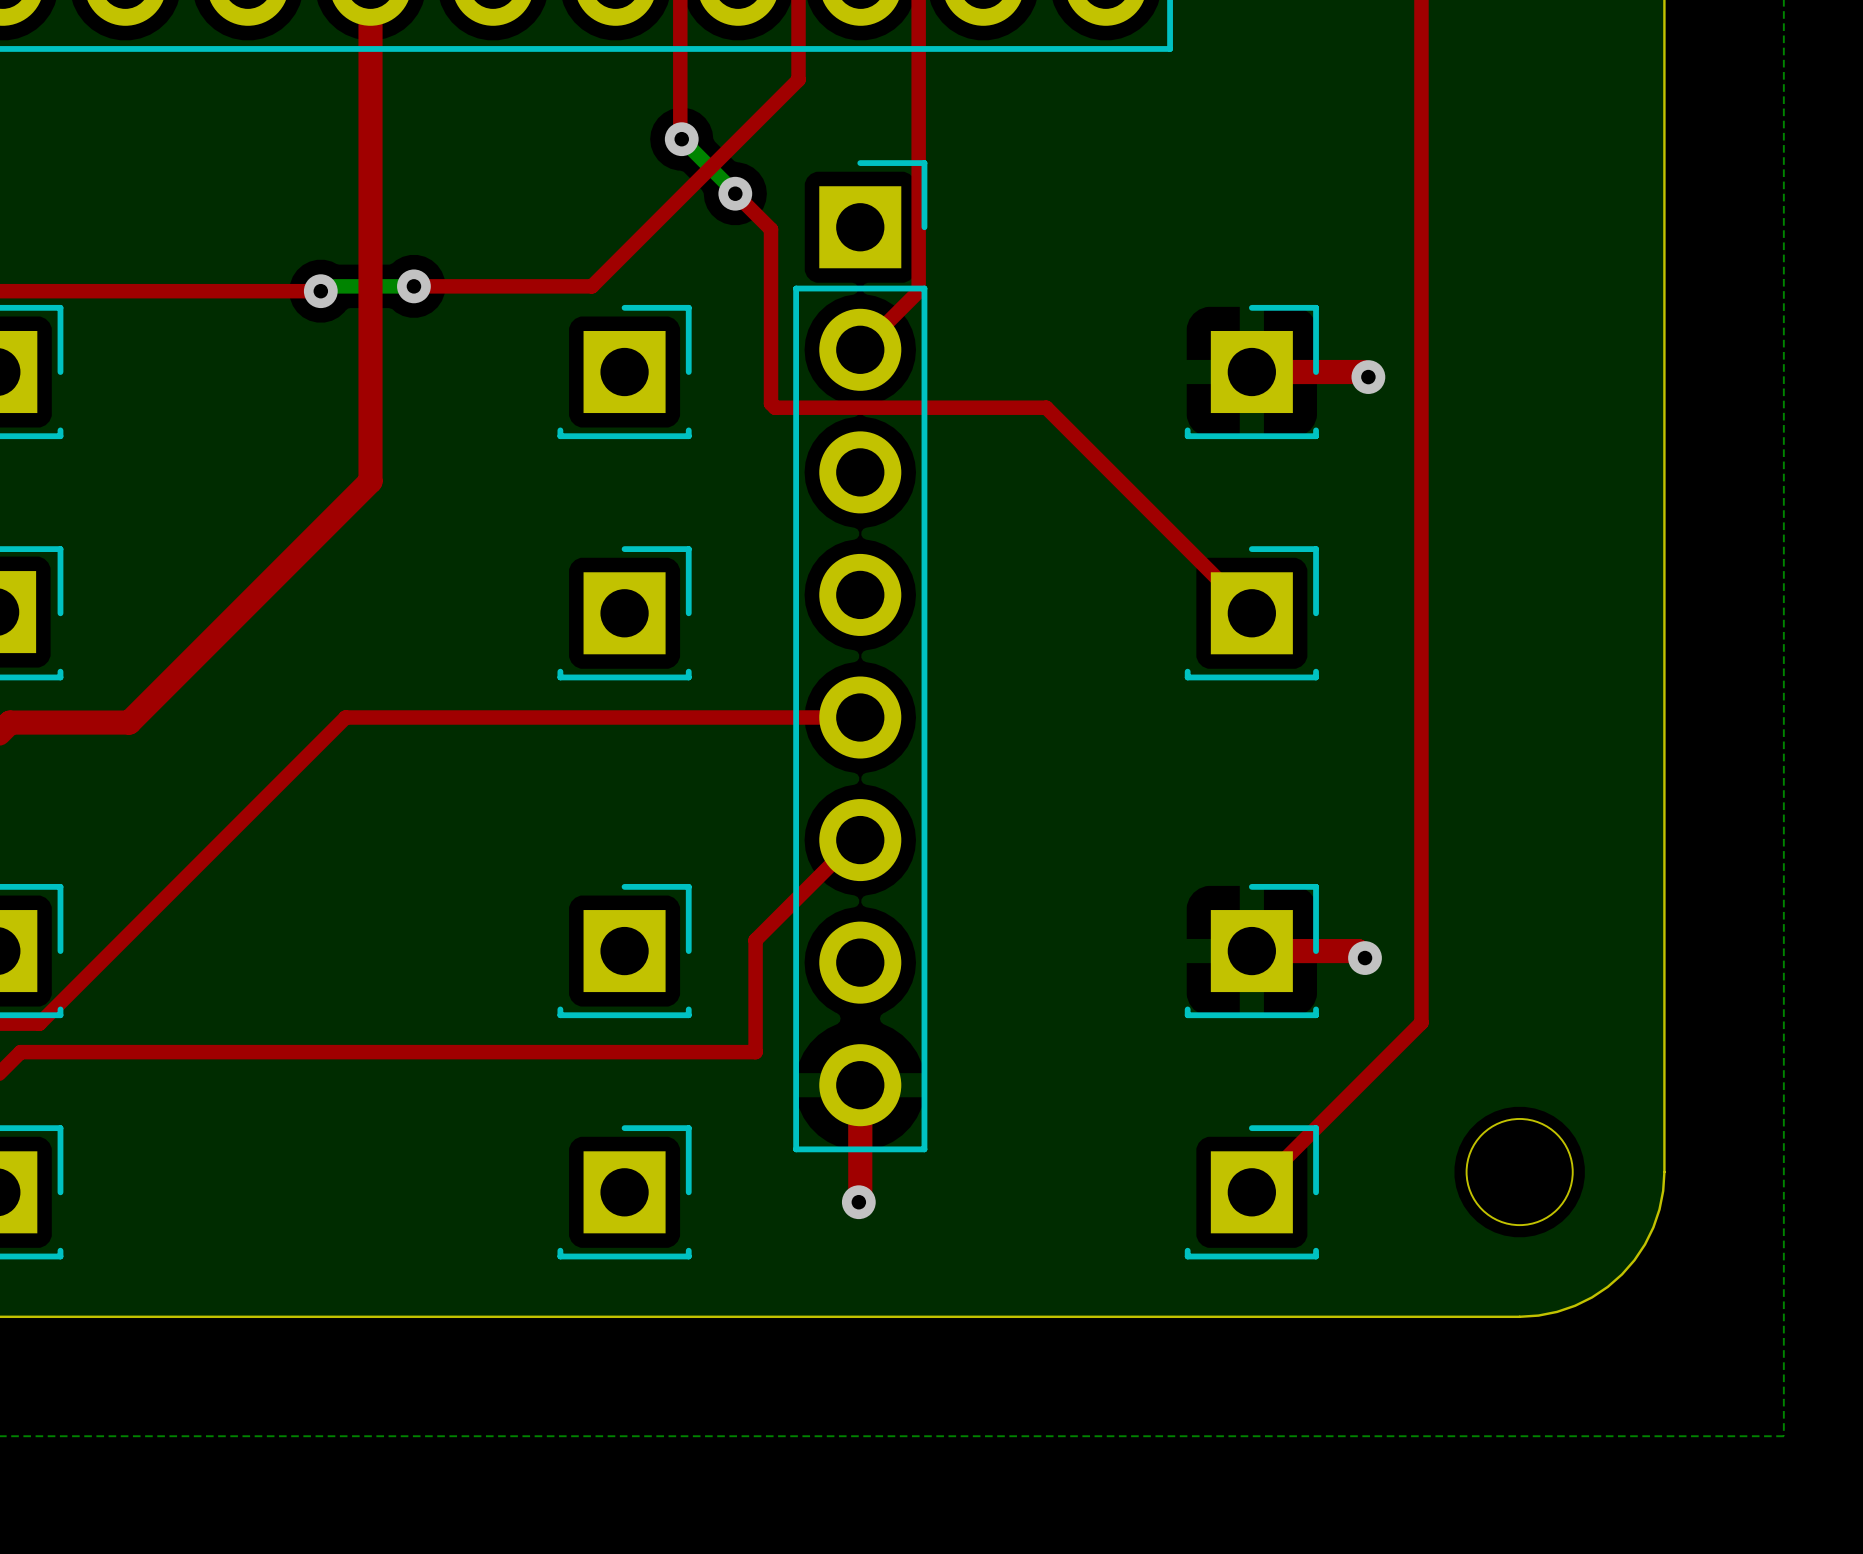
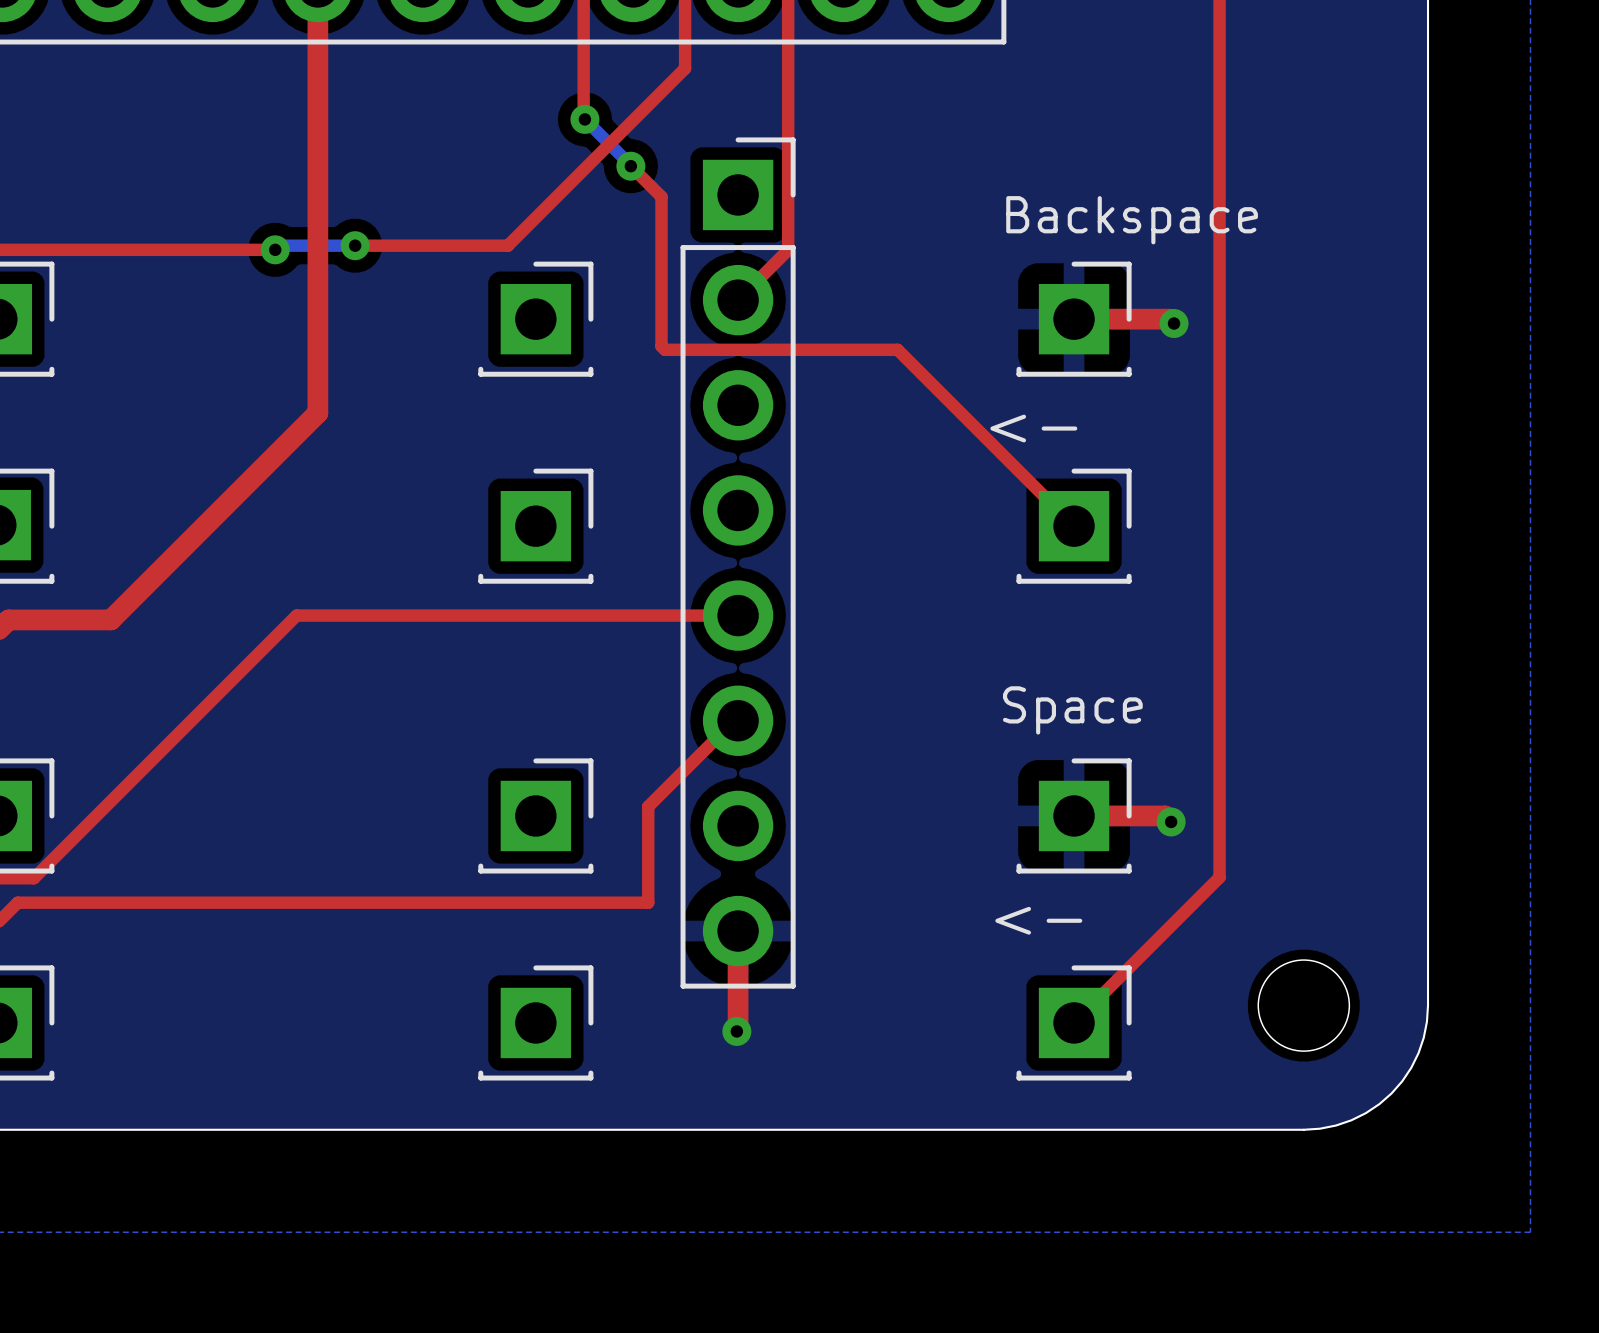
text: none -> Backspace (1132, 220)
text: none -> <- (1033, 428)
text: none -> Space (1072, 710)
text: none -> <- (1038, 920)

